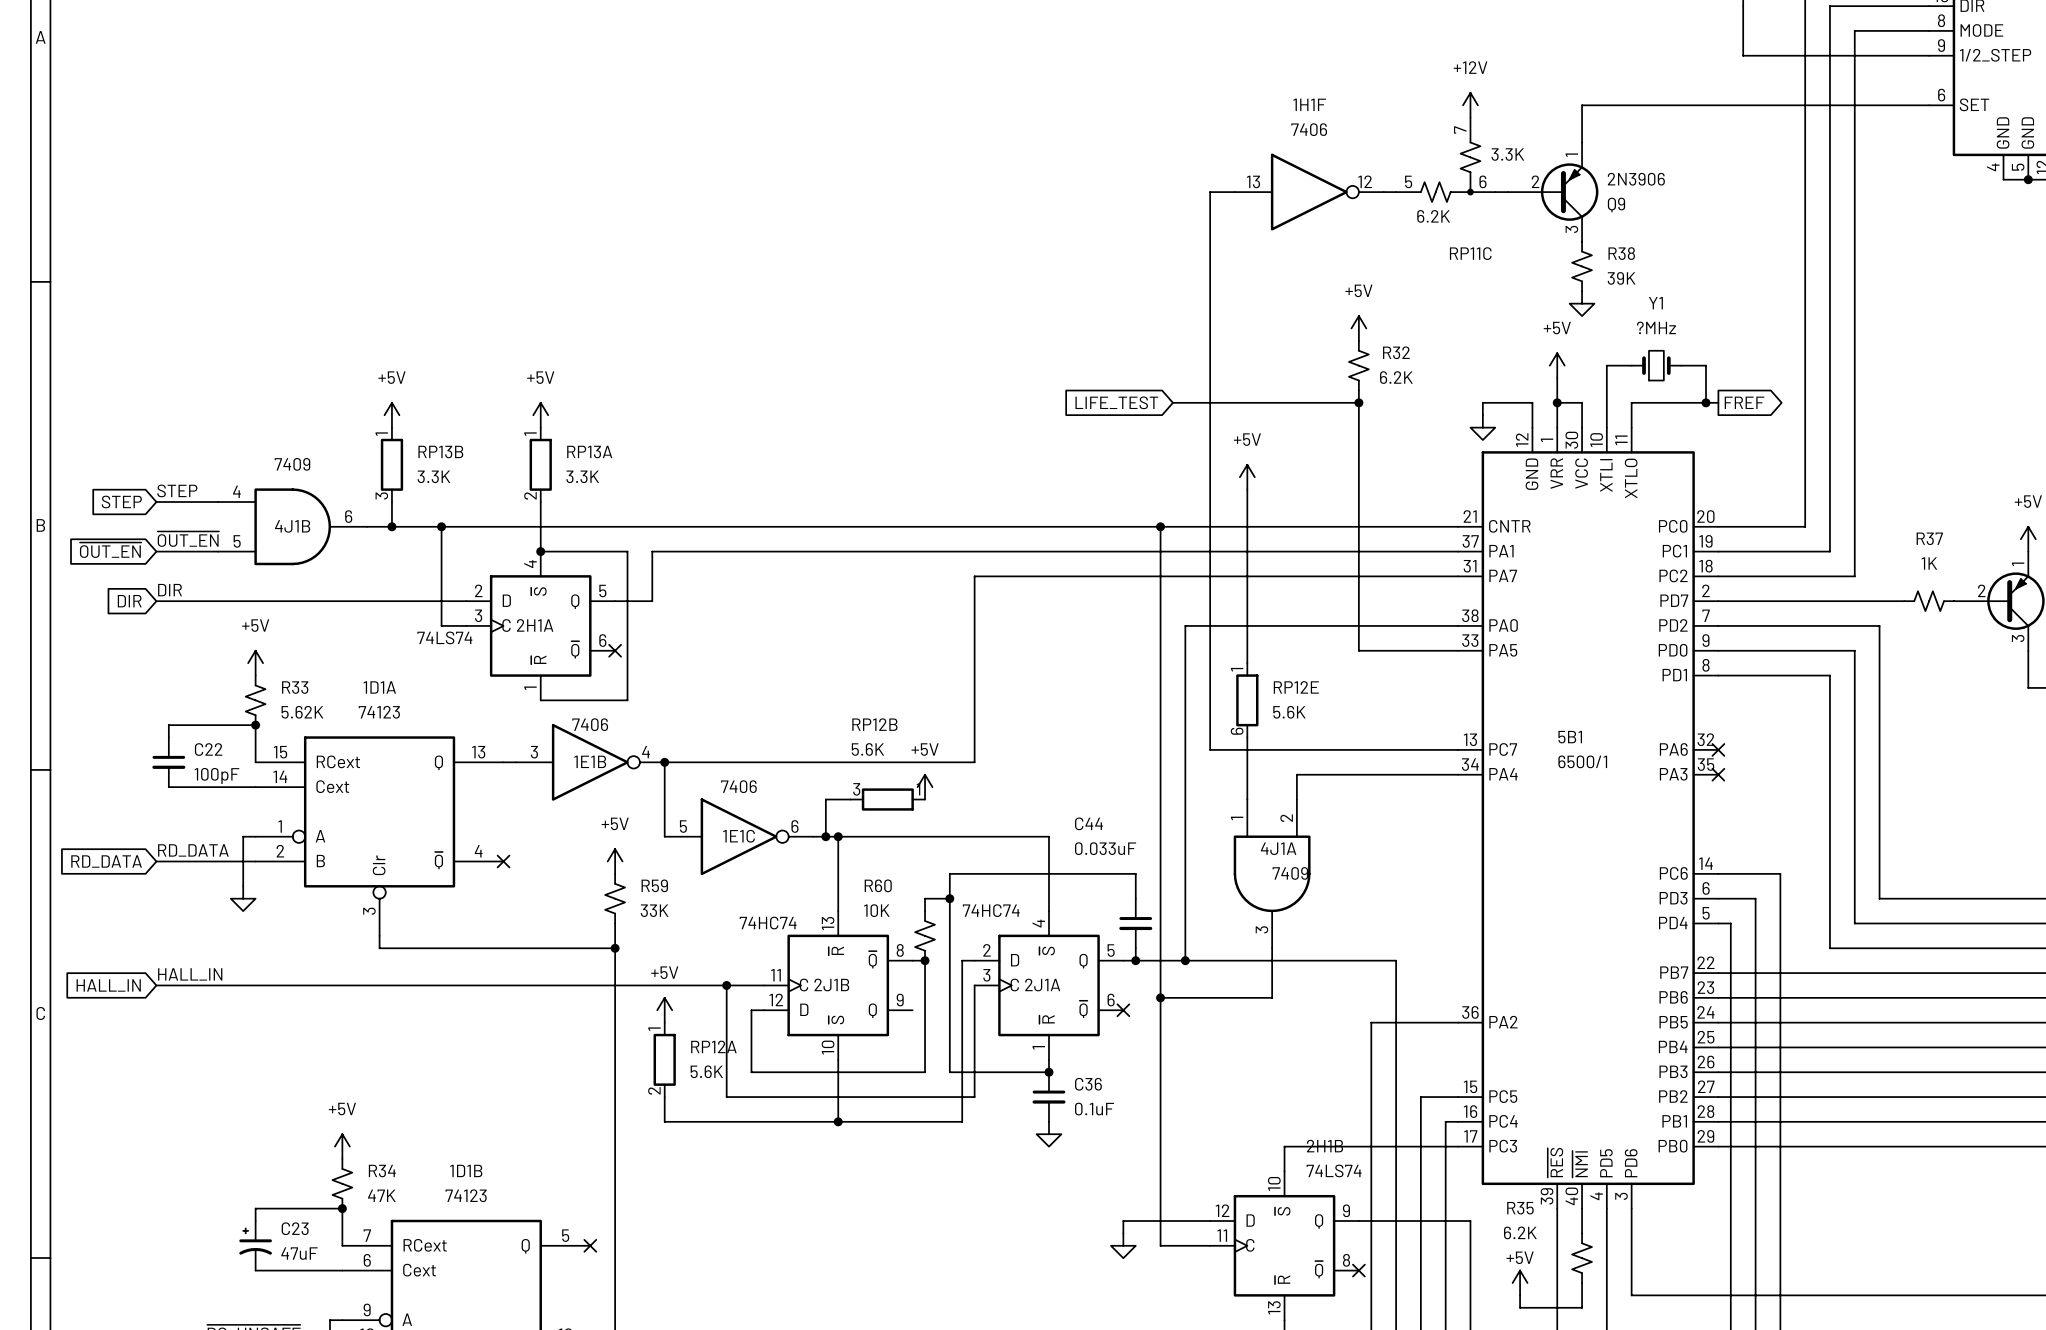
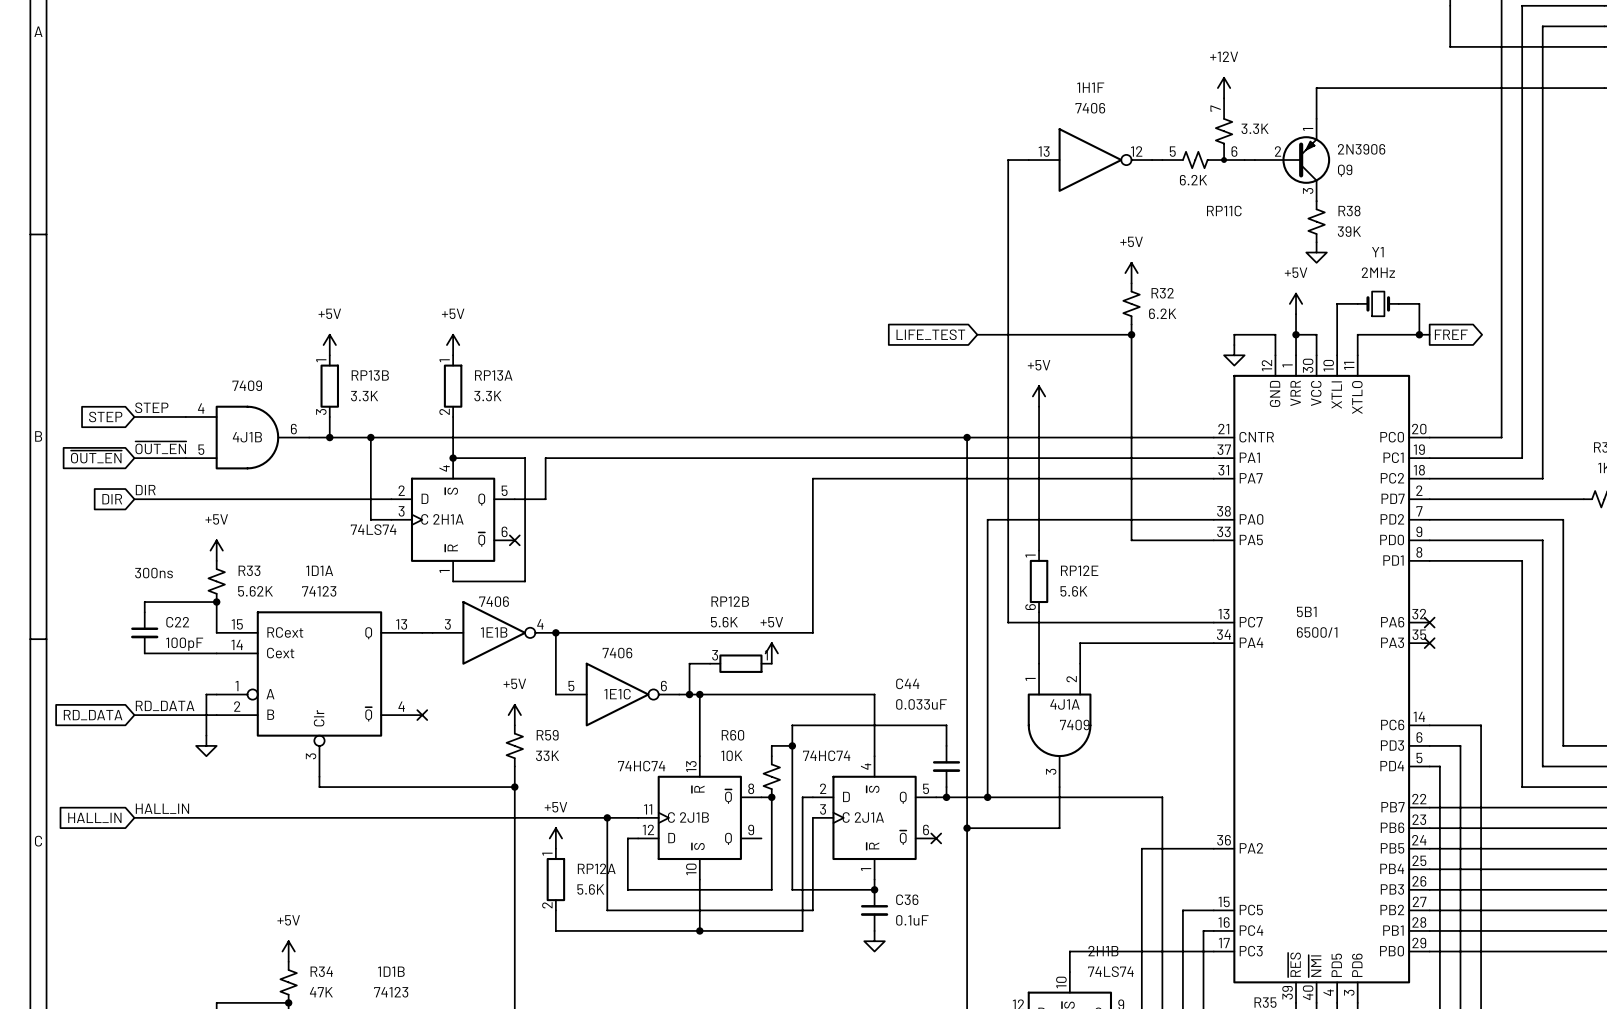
Y1 value: ?MHz (1656, 327) -> 2MHz (1378, 272)
text: none -> 300ns (154, 573)

